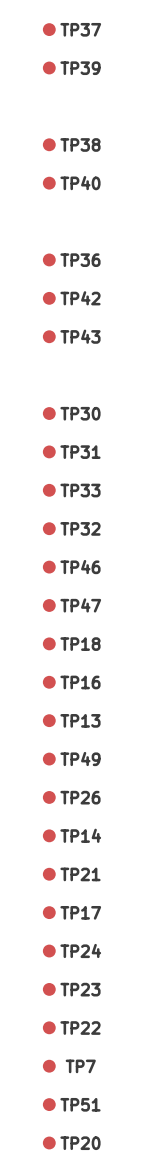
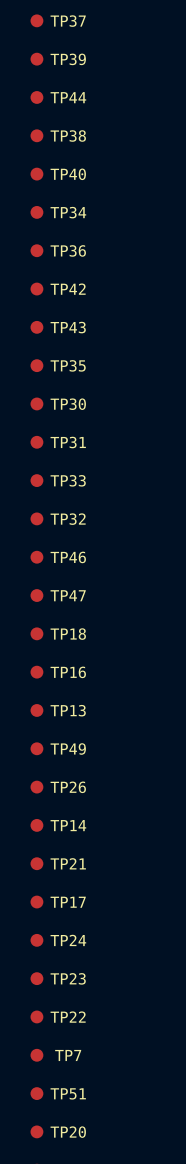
TP44: none -> (36, 97)
TP34: none -> (36, 212)
TP35: none -> (36, 365)

